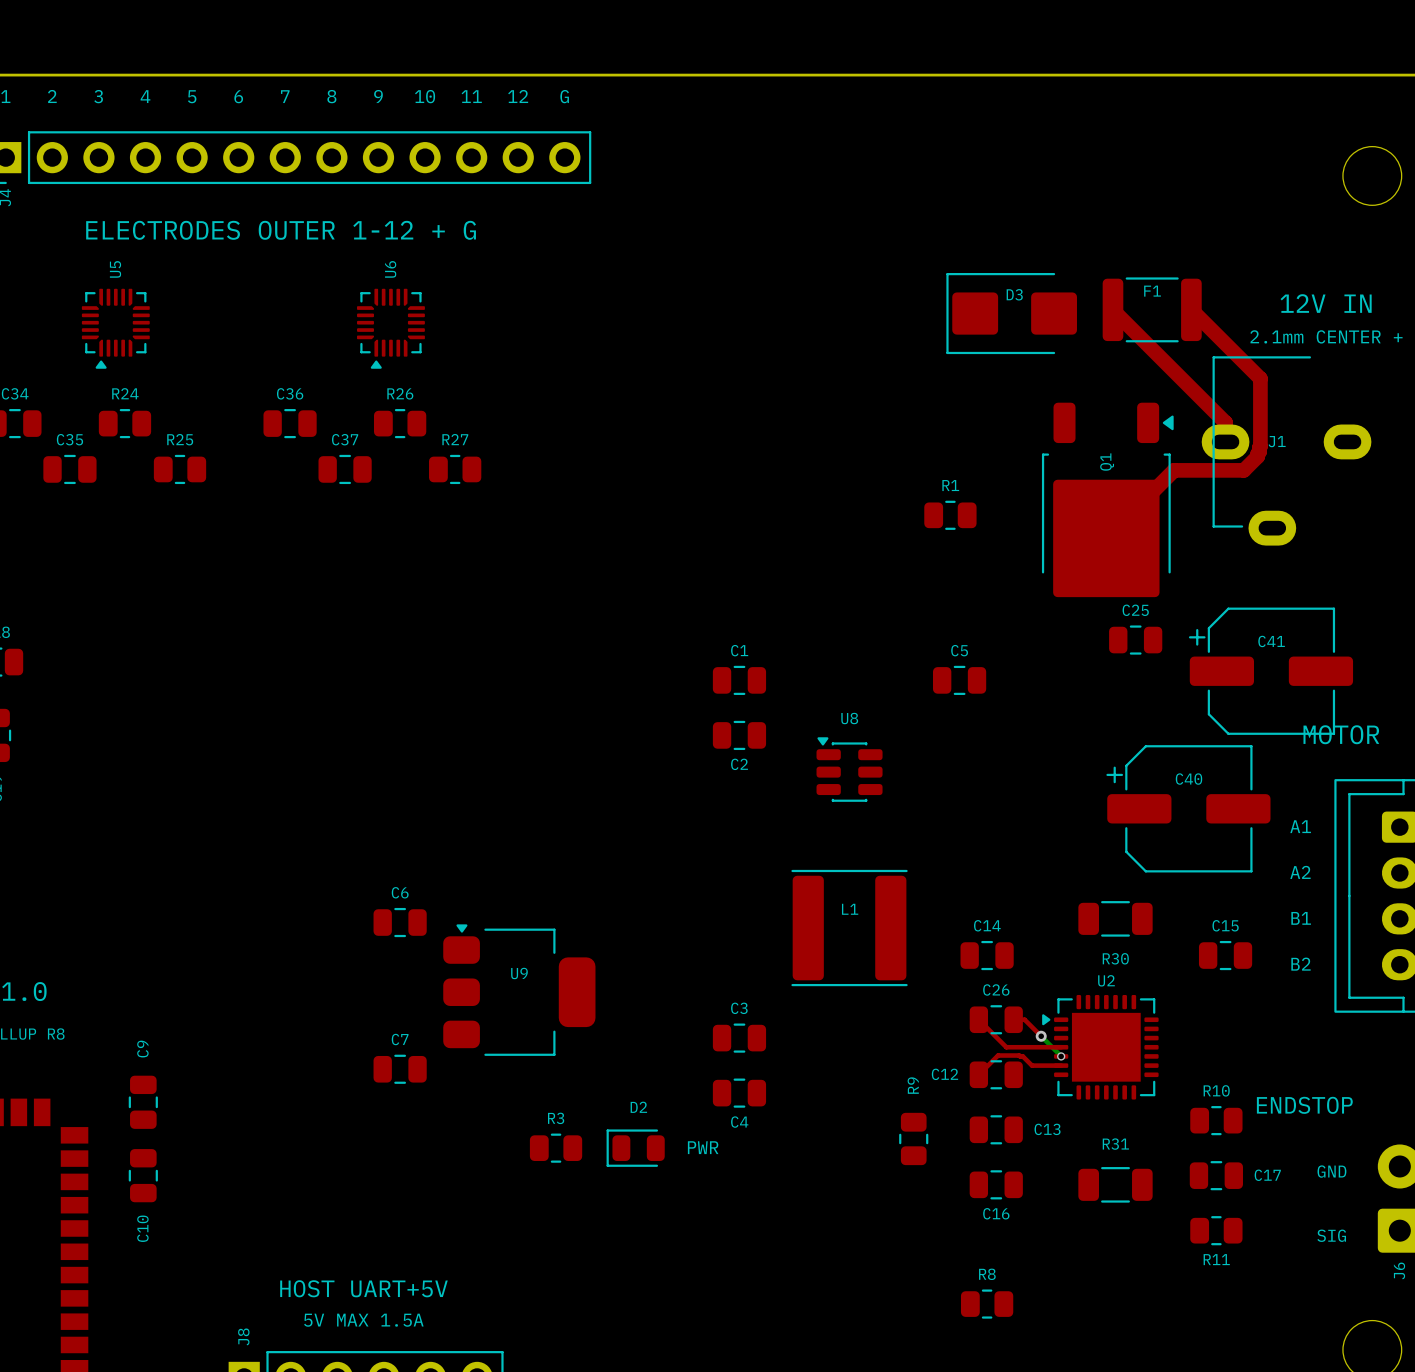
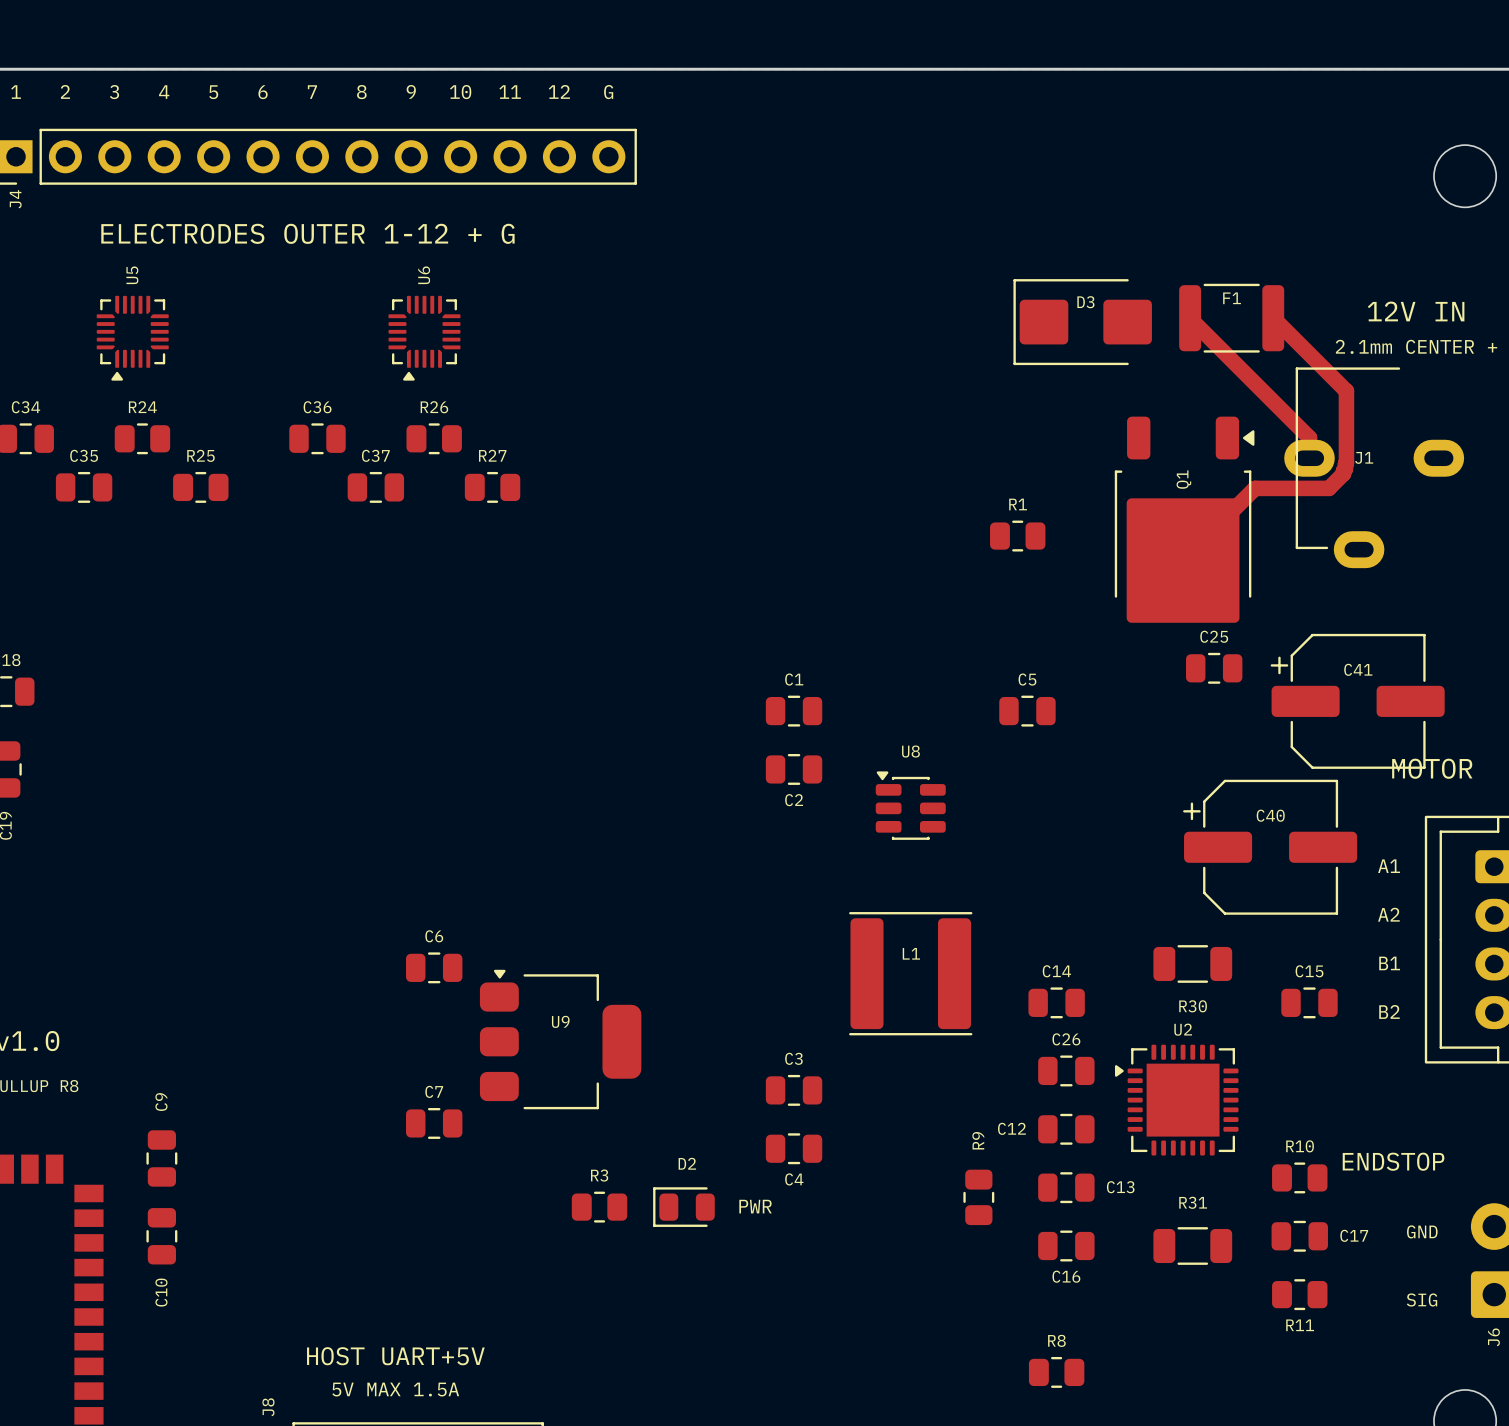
top track: (978, 1019) (1006, 1047) (1061, 1047) -> none
top track: (1013, 1019) (1024, 1019) (1041, 1036) -> none
bottom track: (1041, 1036) (1061, 1056) -> none
via: (1041, 1036) -> none
via: (1061, 1056) -> none
top track: (1061, 1065) (1032, 1065) (1022, 1056) (998, 1055) (978, 1074) -> none

